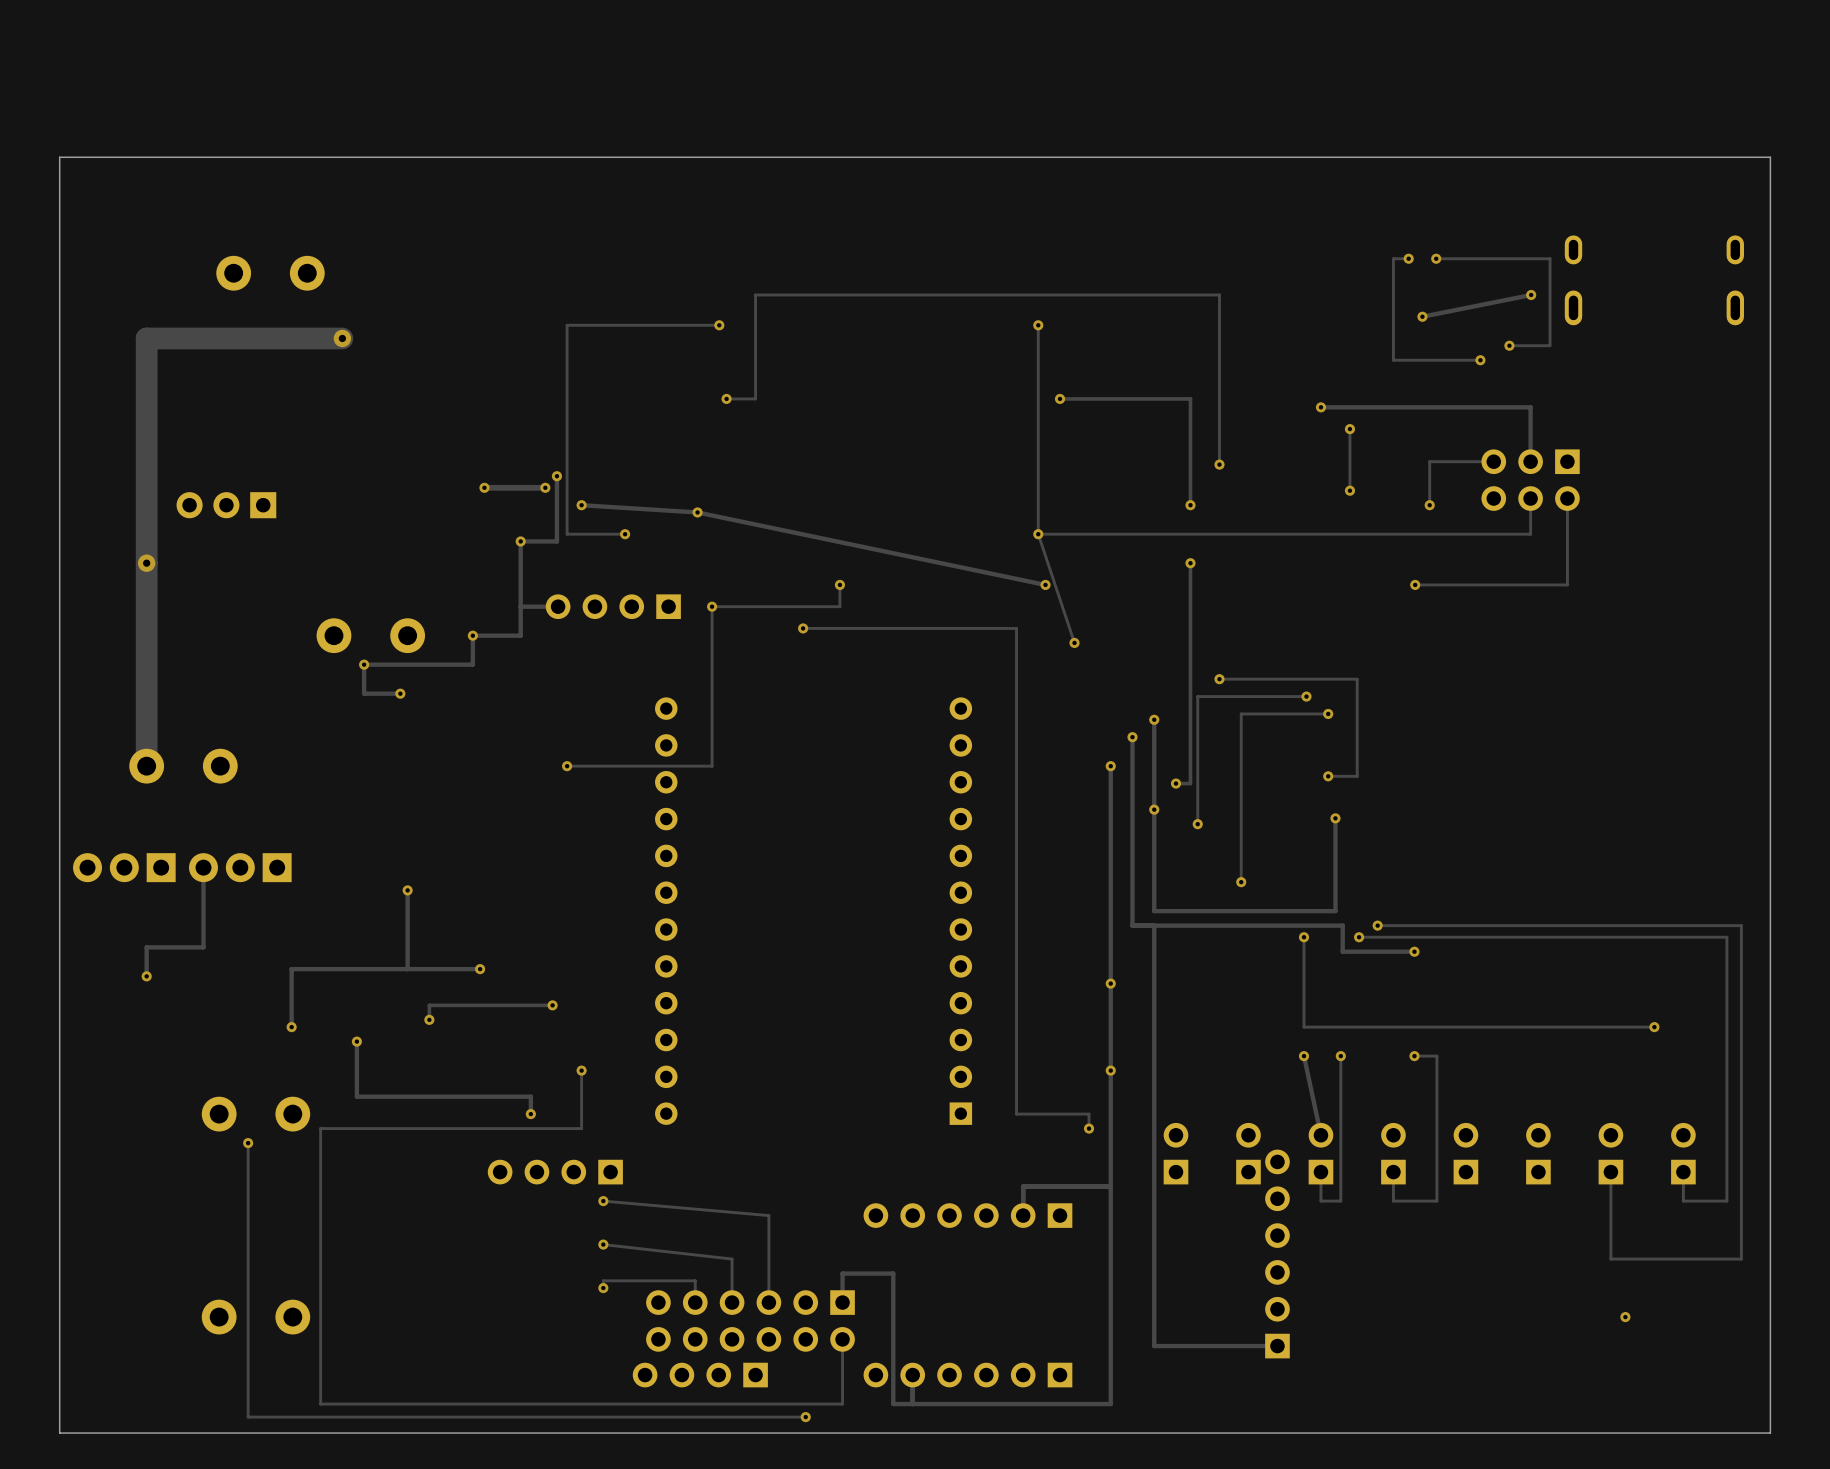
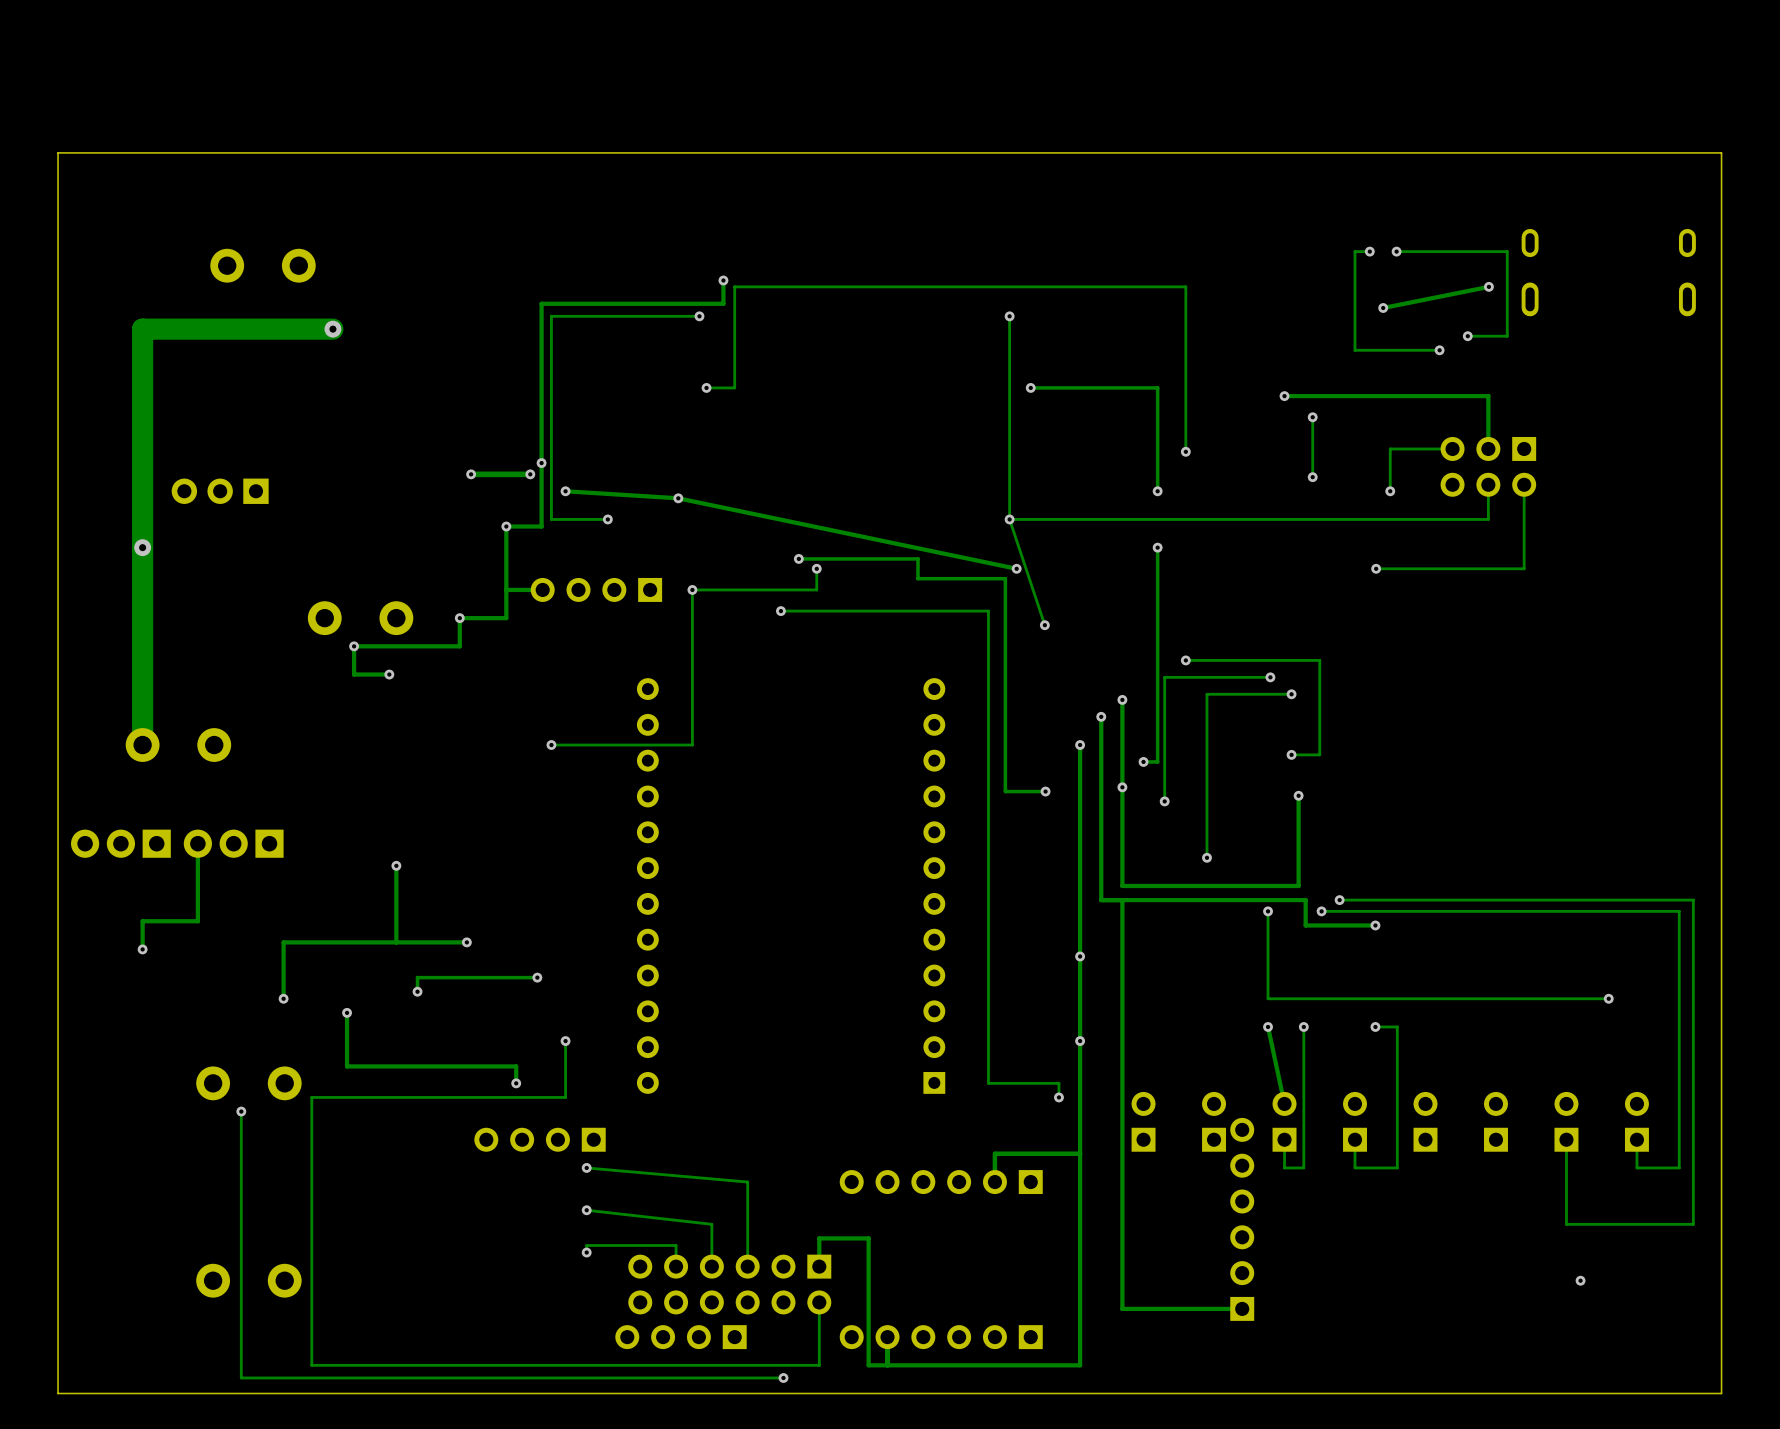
track: none -> (723, 280) (723, 303) (541, 303) (541, 463)
via: none -> (723, 280)
track: none -> (798, 558) (917, 558) (917, 578) (1005, 578) (1005, 791) (1045, 791)
via: none -> (798, 558)
via: none -> (1045, 791)

